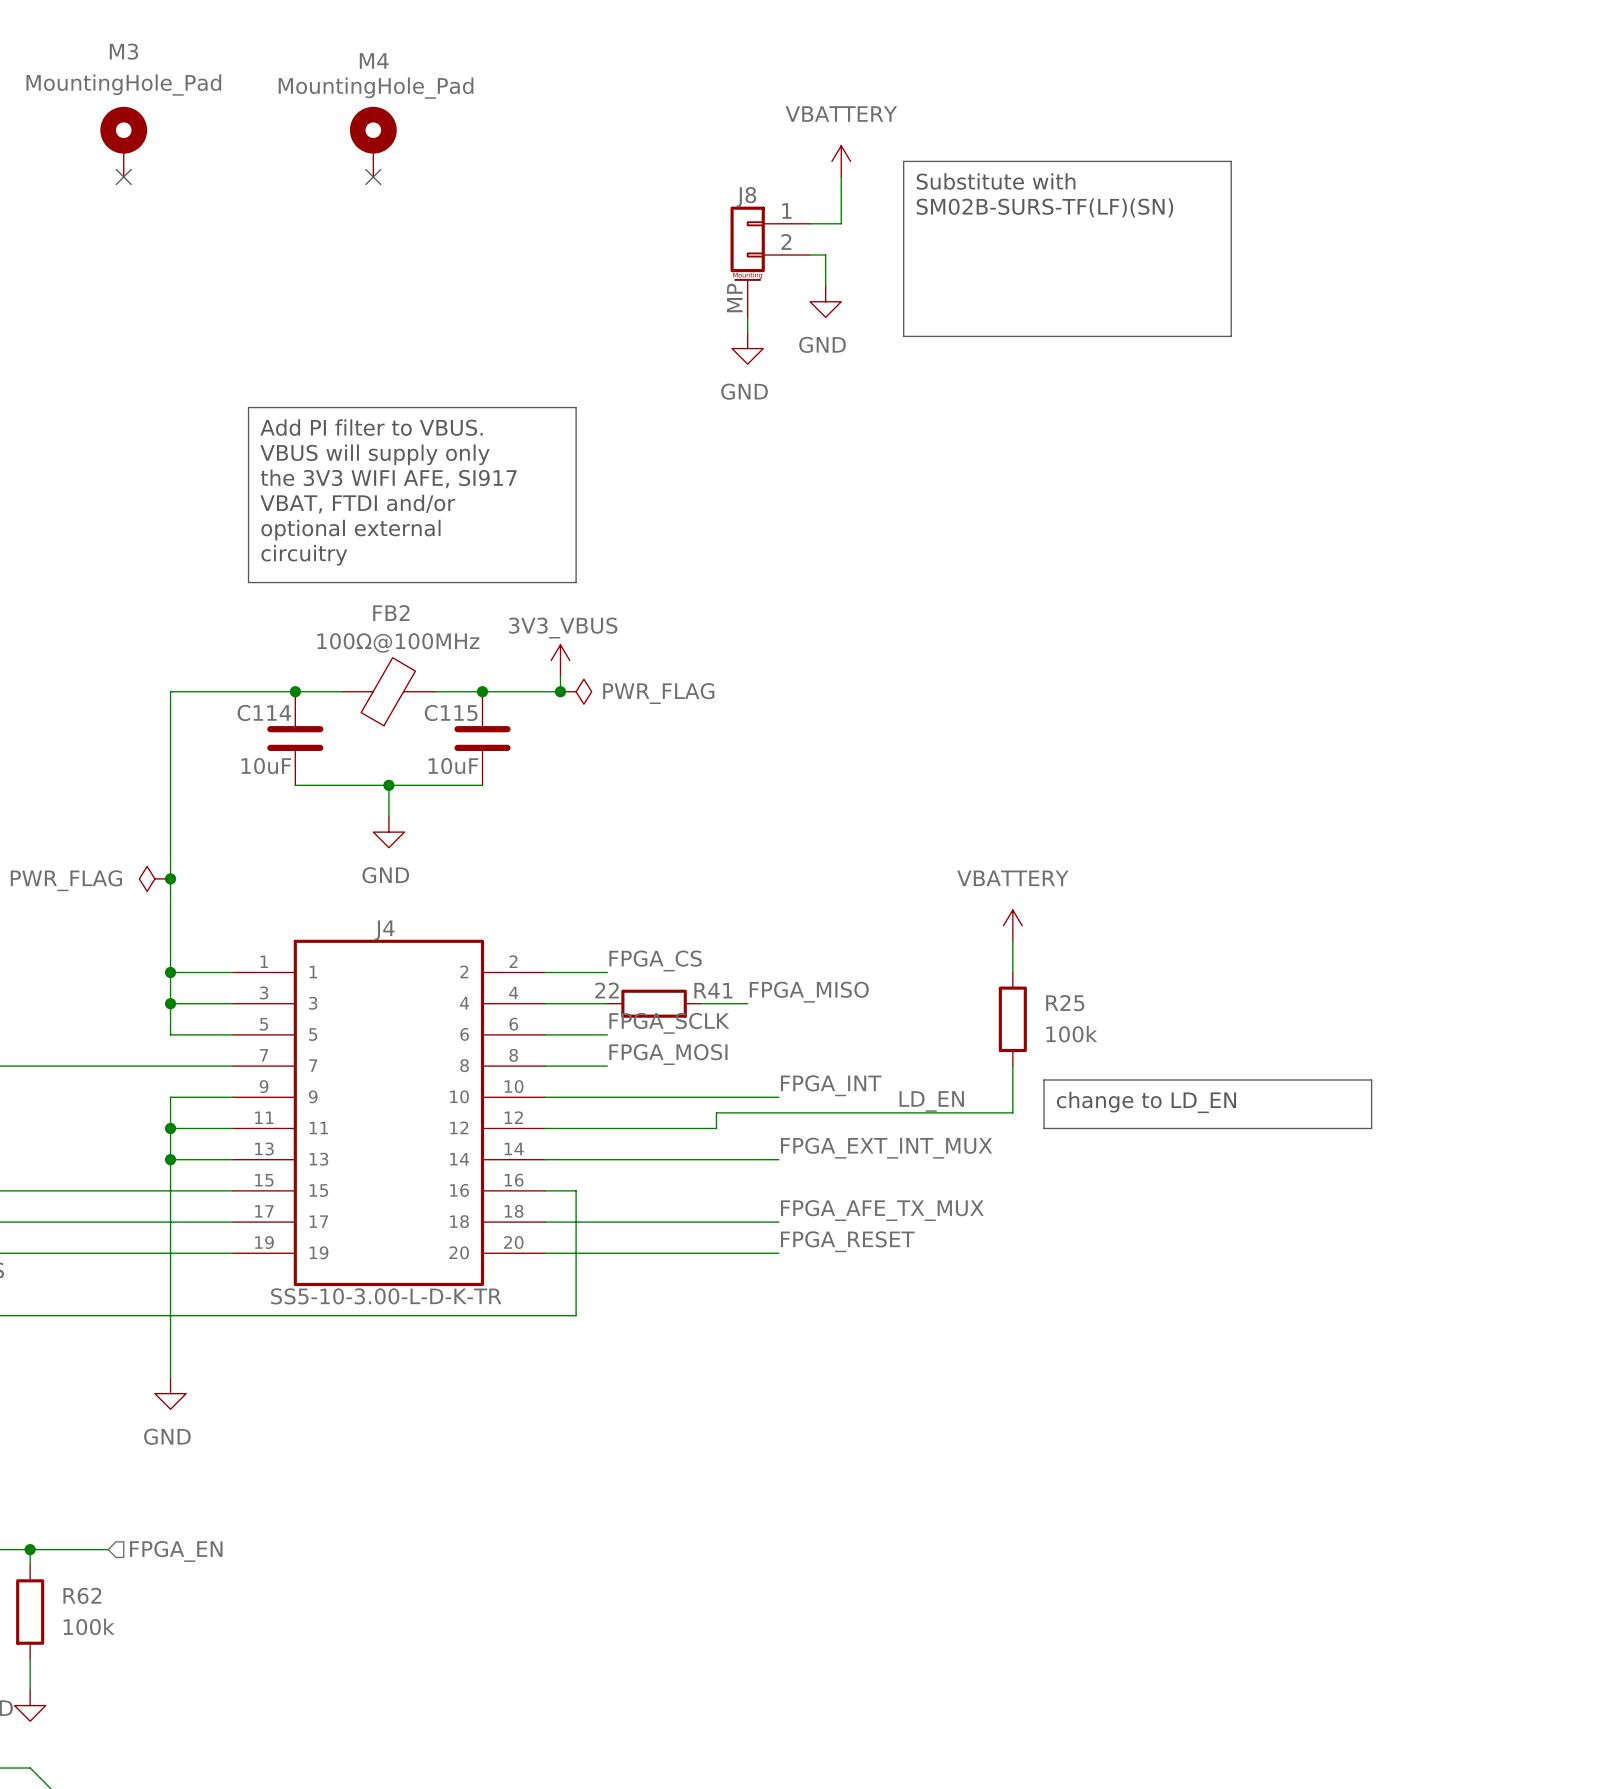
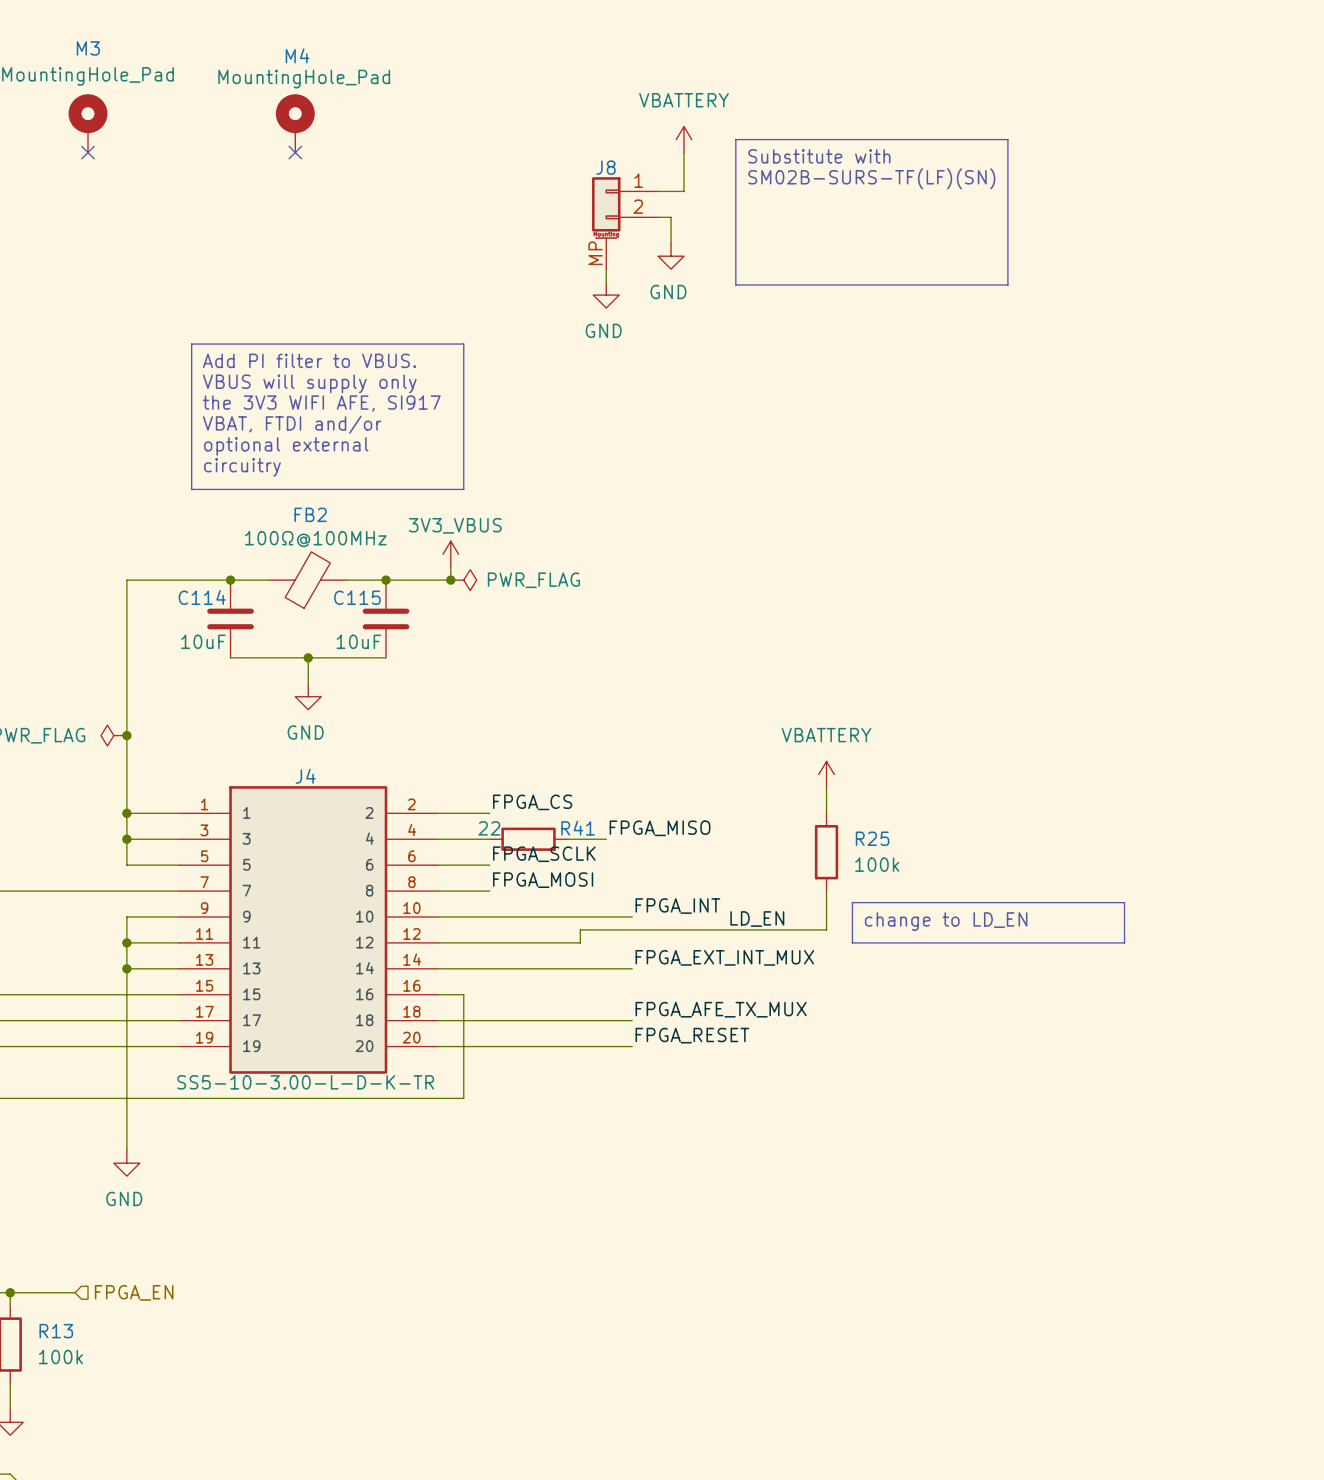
R62 name: R62 (82, 1595) -> R13 (56, 1331)

